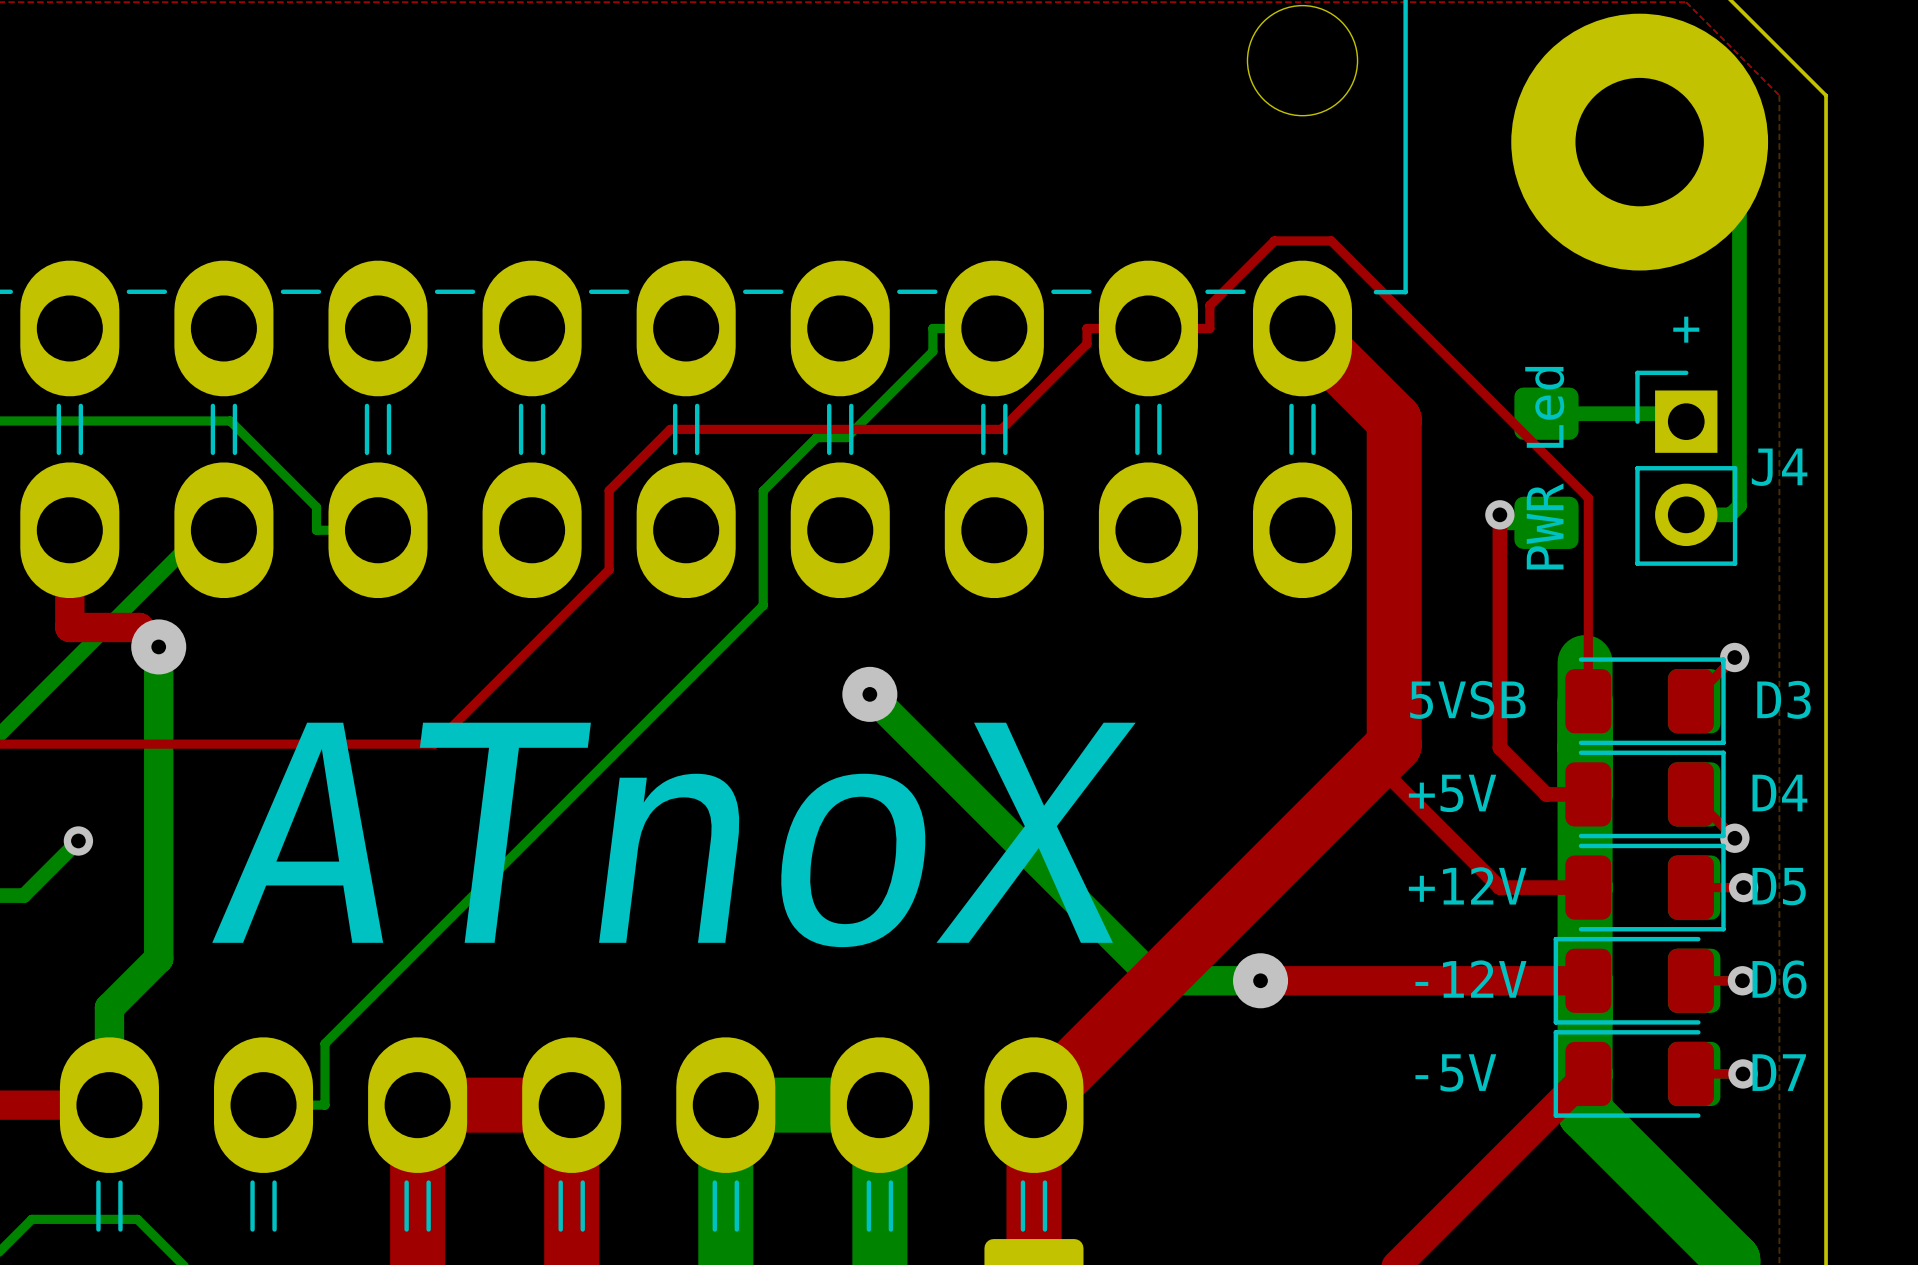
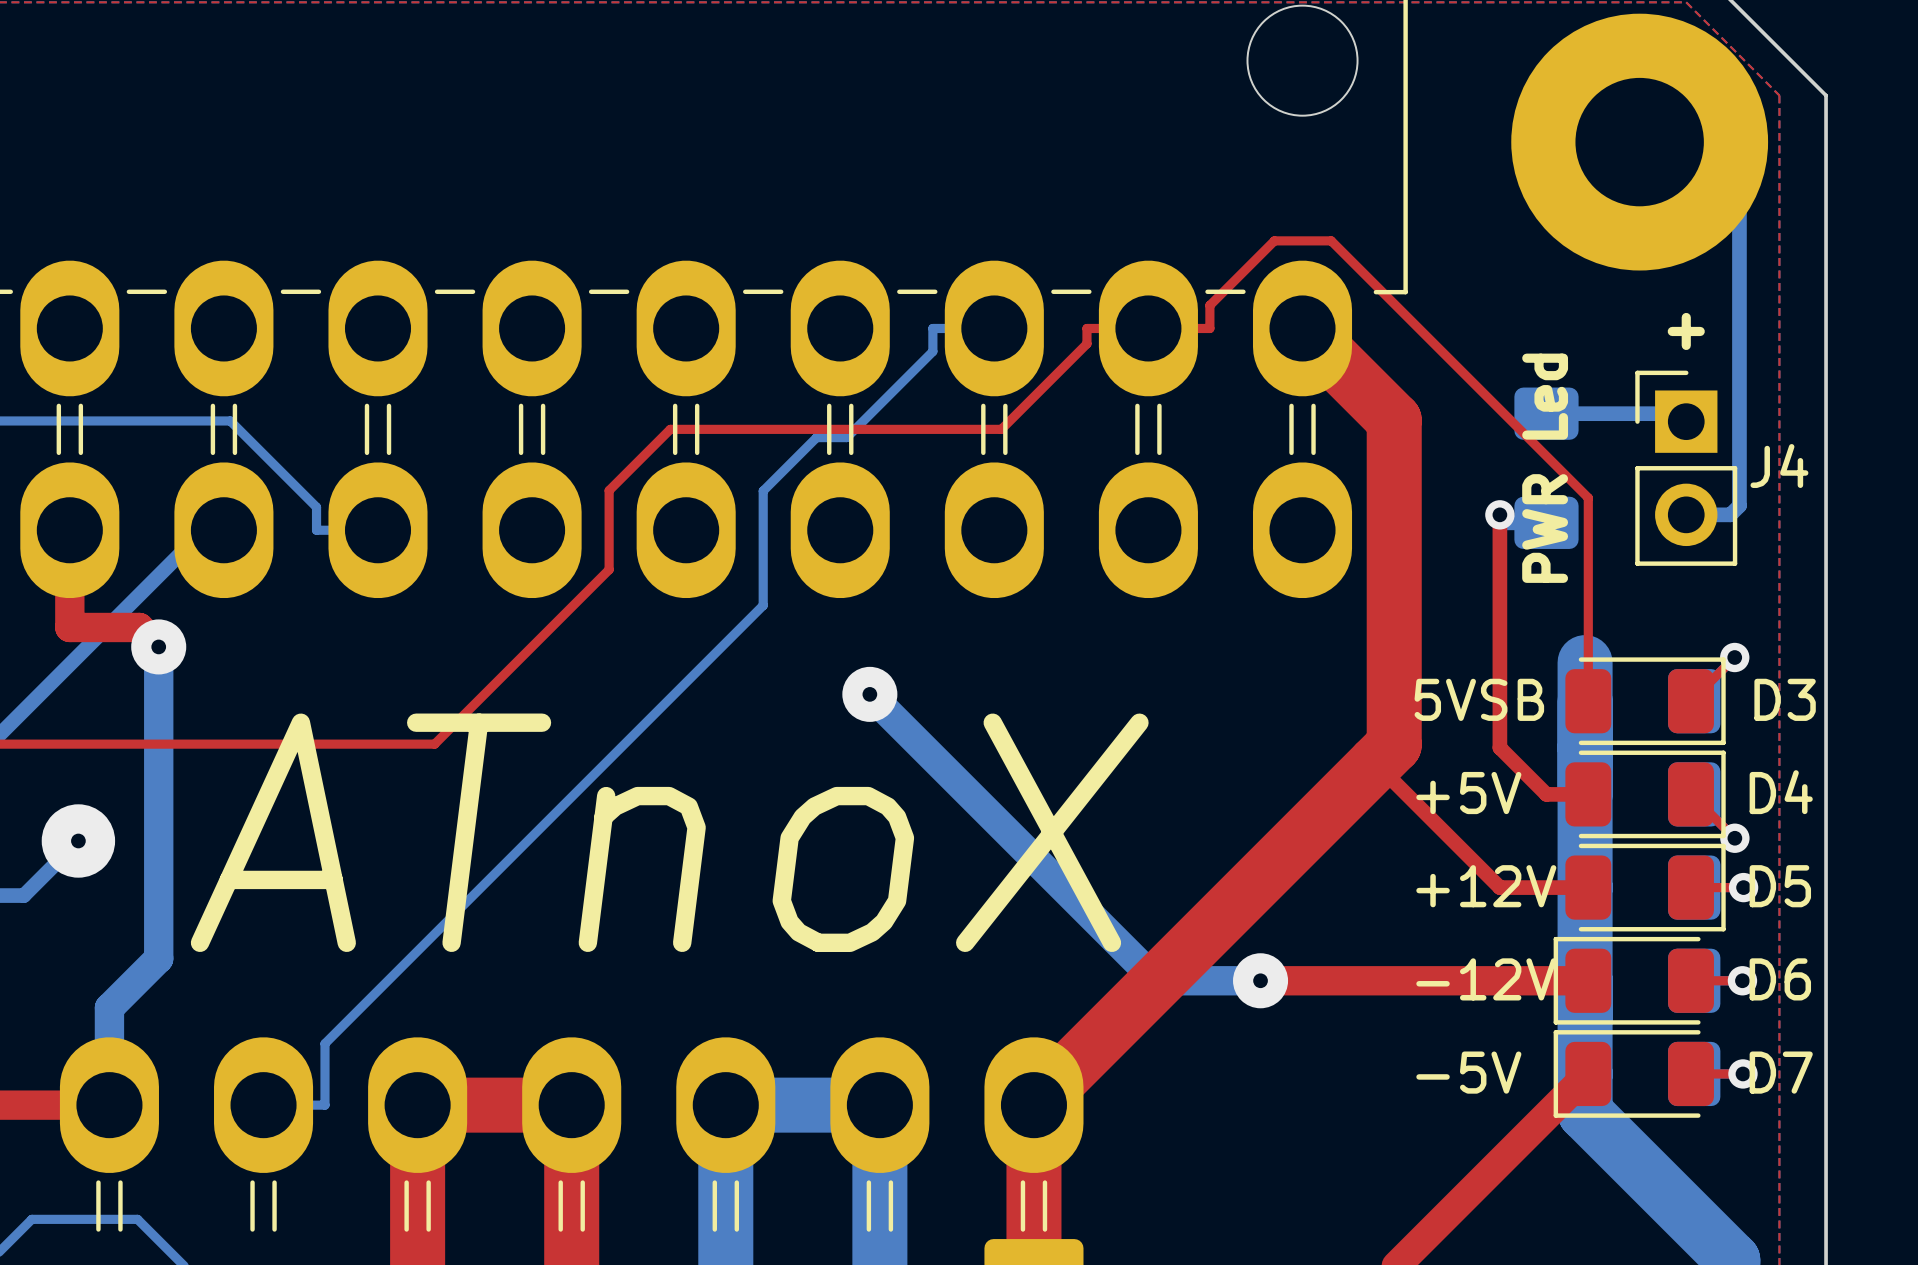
via size: [63, 826, 94, 856] -> [41, 804, 116, 878]

